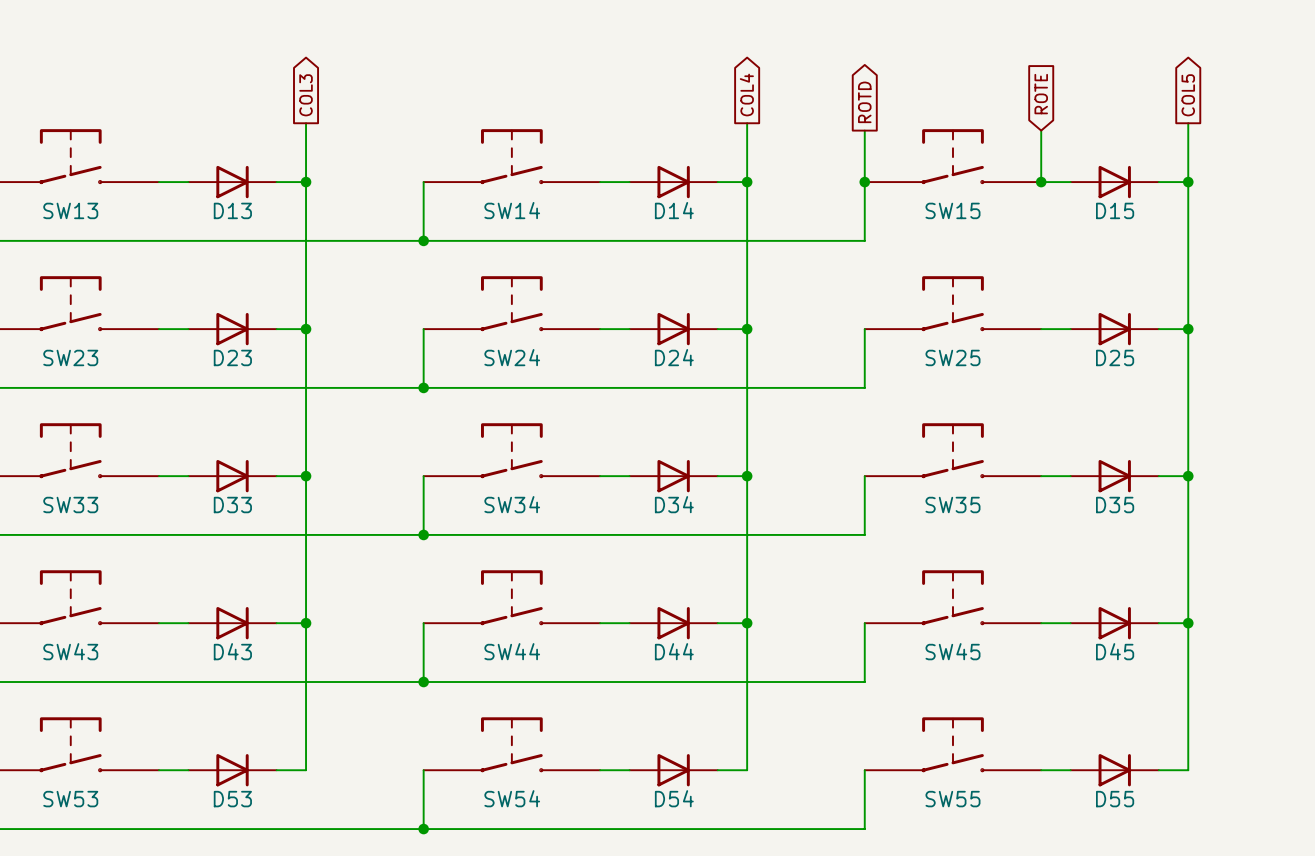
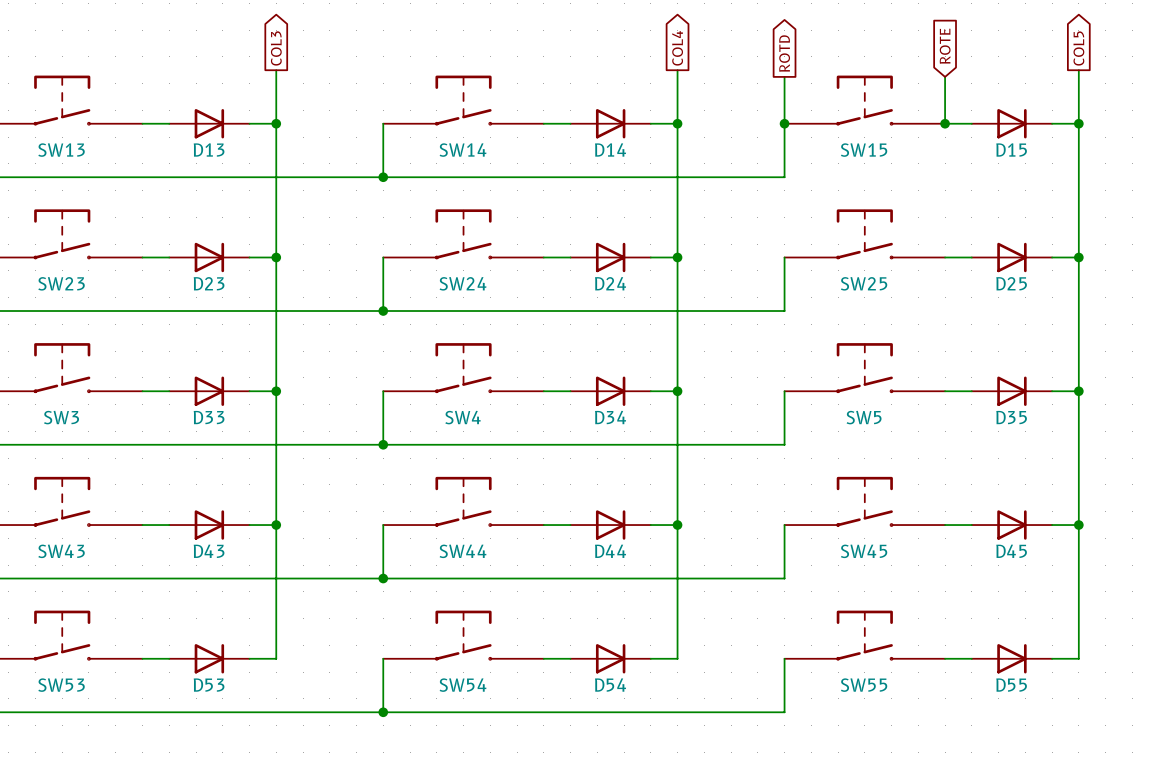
SW34 name: SW34 (512, 504) -> SW4 (463, 417)
SW33 name: SW33 (70, 505) -> SW3 (61, 417)
SW35 name: SW35 (952, 505) -> SW5 (864, 417)

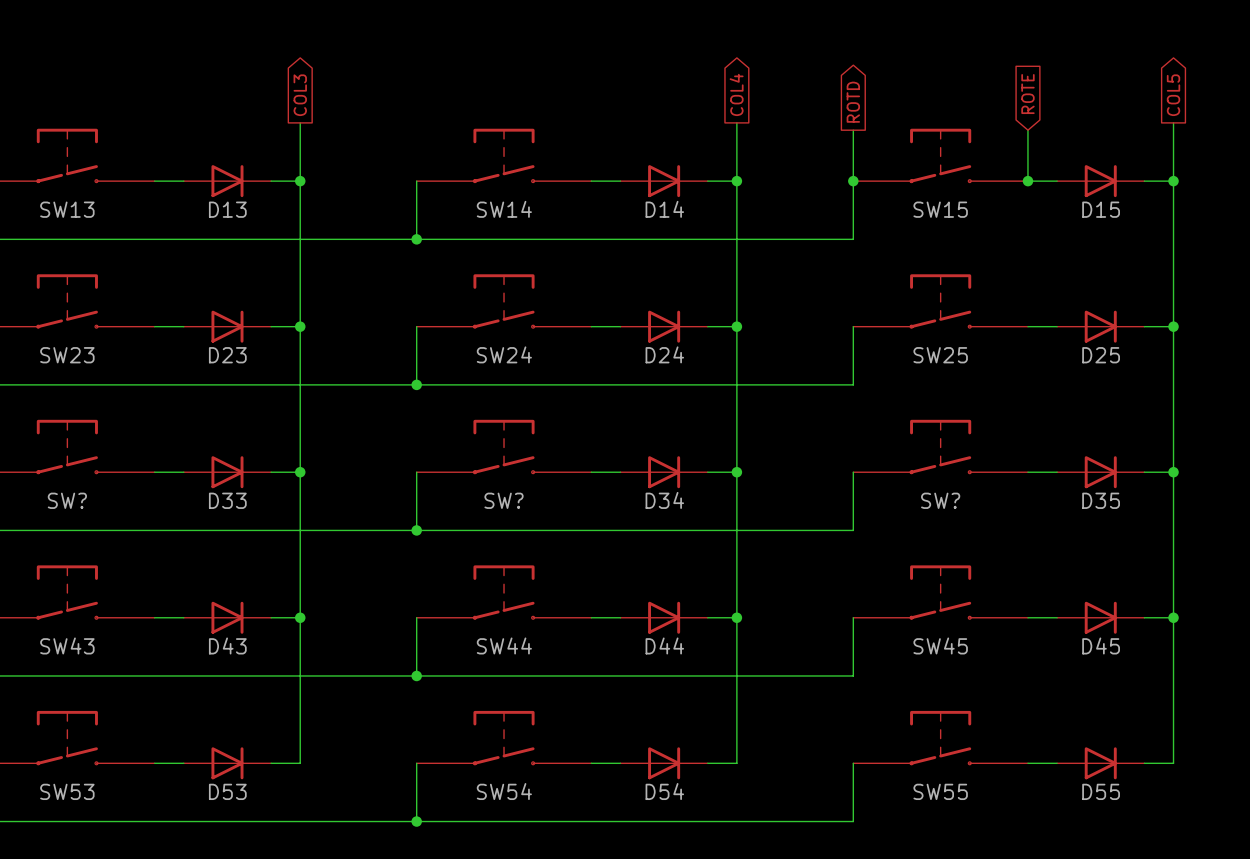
SW3 name: SW3 (61, 417) -> SW? (67, 500)
SW4 name: SW4 (463, 417) -> SW? (504, 500)
SW5 name: SW5 (864, 417) -> SW? (940, 500)

